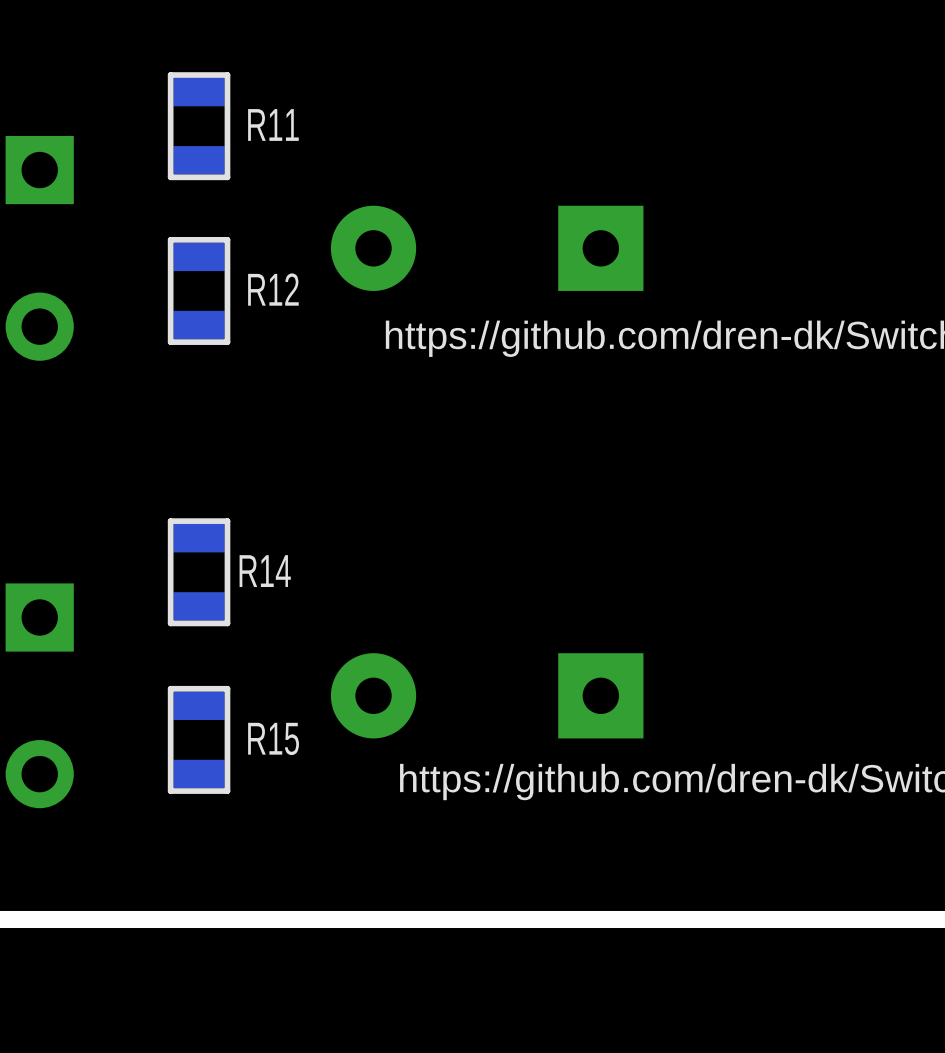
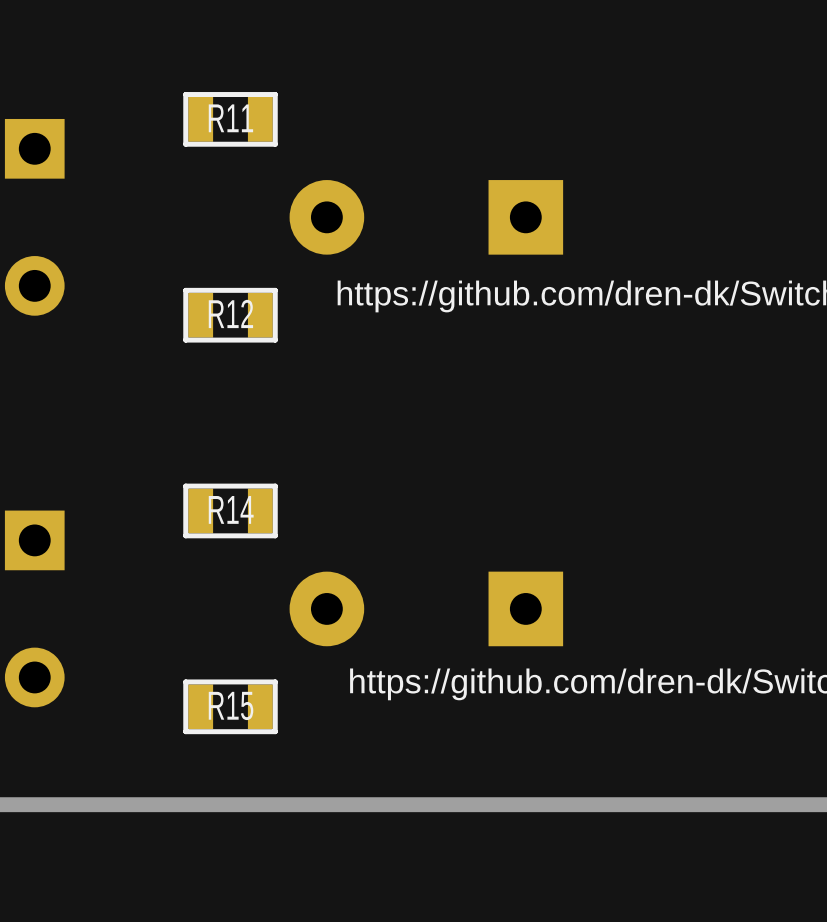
R11 rotation: 0° (199, 126) -> 90° clockwise (230, 119)
R11 position: (199, 126) -> (230, 119)
R12 rotation: 0° (199, 290) -> 90° clockwise (230, 315)
R12 position: (199, 290) -> (230, 315)
R14 rotation: 0° (199, 572) -> 90° clockwise (230, 510)
R14 position: (199, 572) -> (230, 510)
R15 rotation: 0° (199, 739) -> 90° clockwise (230, 706)
R15 position: (199, 739) -> (230, 706)

